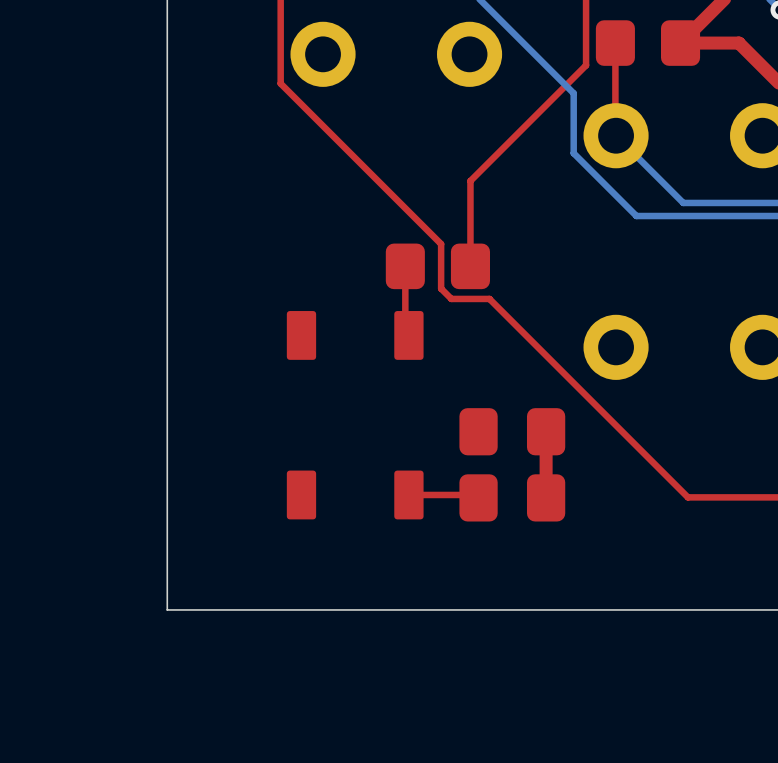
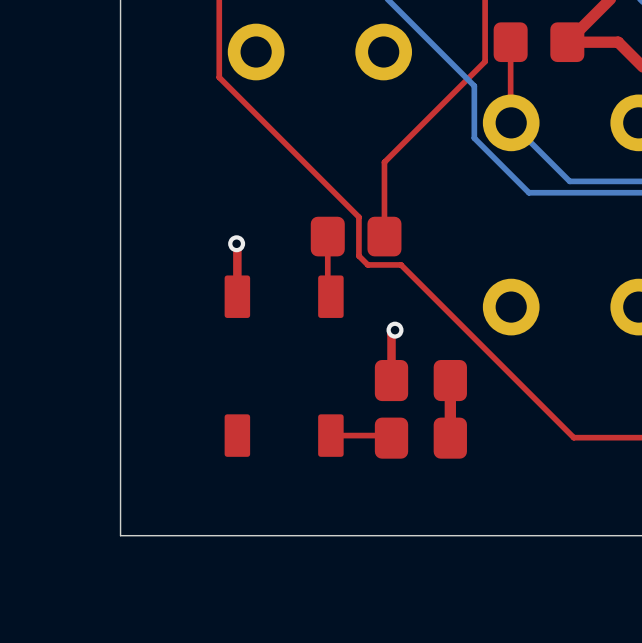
top track: none -> (236, 243) (237, 296)
via: none -> (236, 243)
top track: none -> (395, 330) (391, 333) (391, 380)
via: none -> (395, 330)

